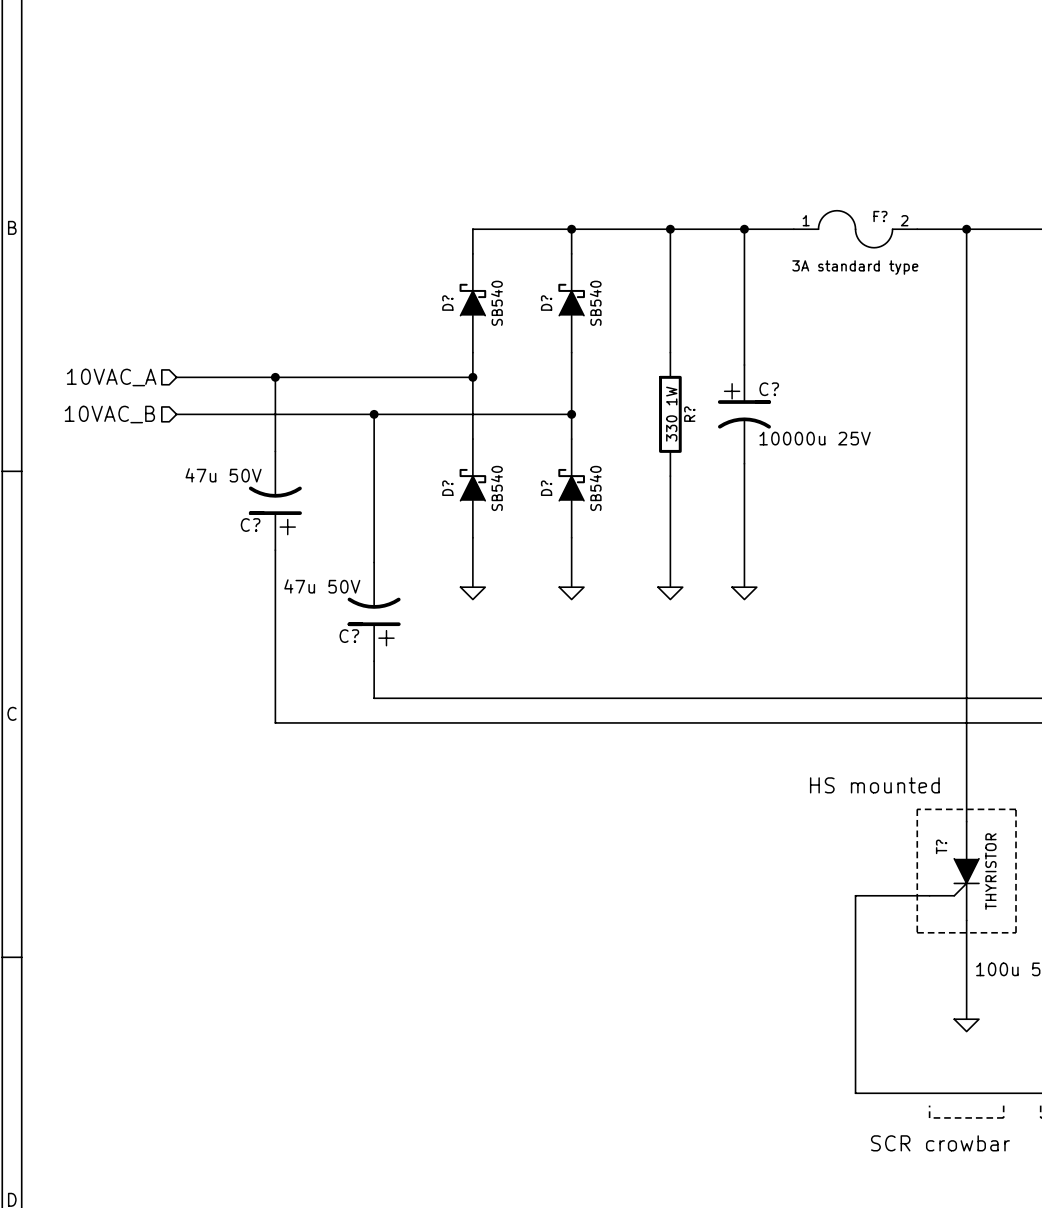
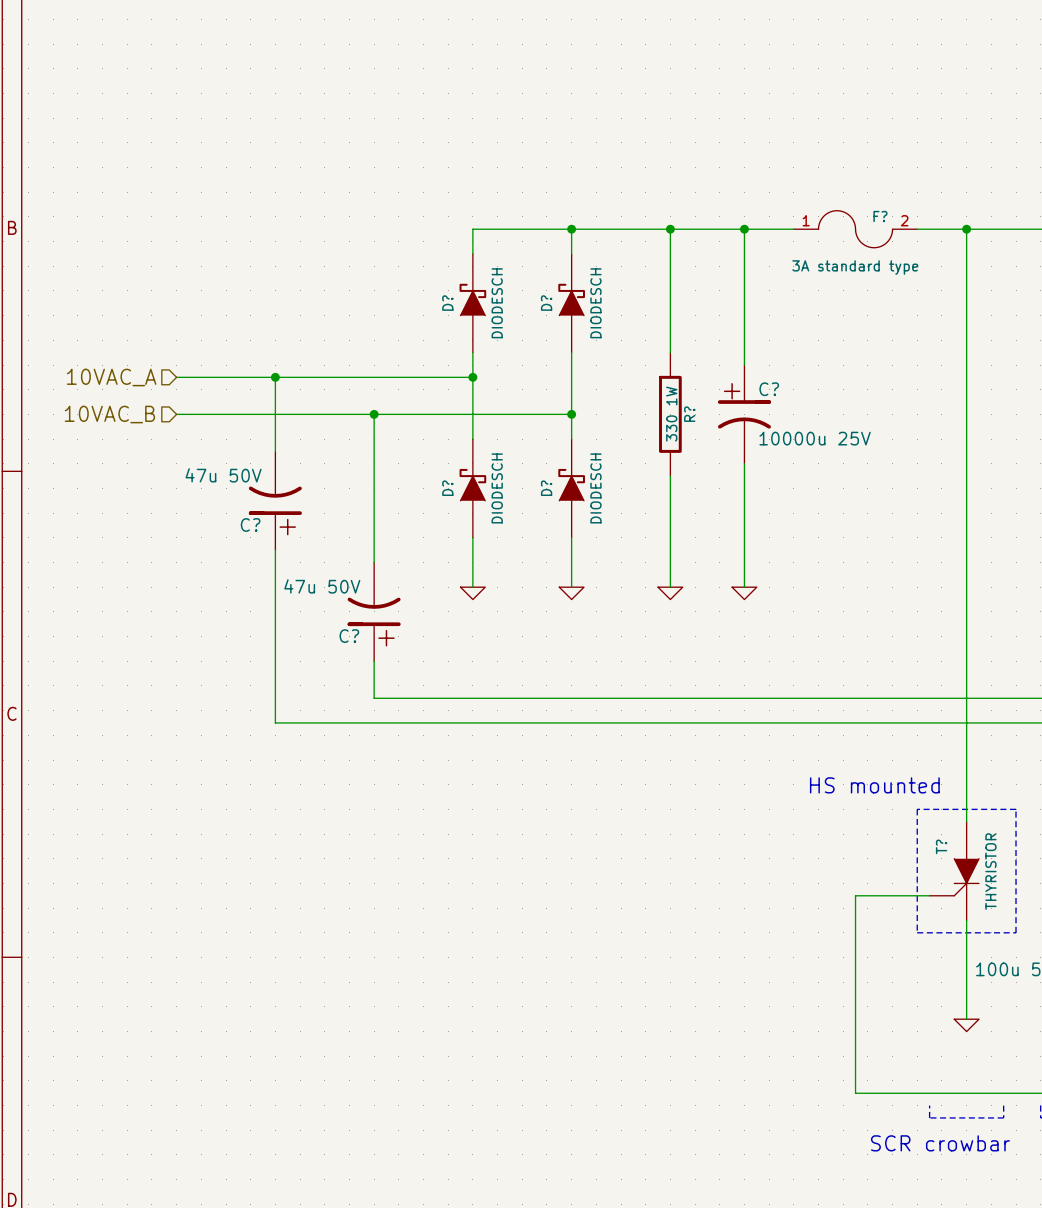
D? value: SB540 (496, 303) -> DIODESCH (497, 303)
D? value: SB540 (595, 303) -> DIODESCH (595, 303)
D? value: SB540 (496, 488) -> DIODESCH (497, 488)
D? value: SB540 (595, 488) -> DIODESCH (595, 488)

